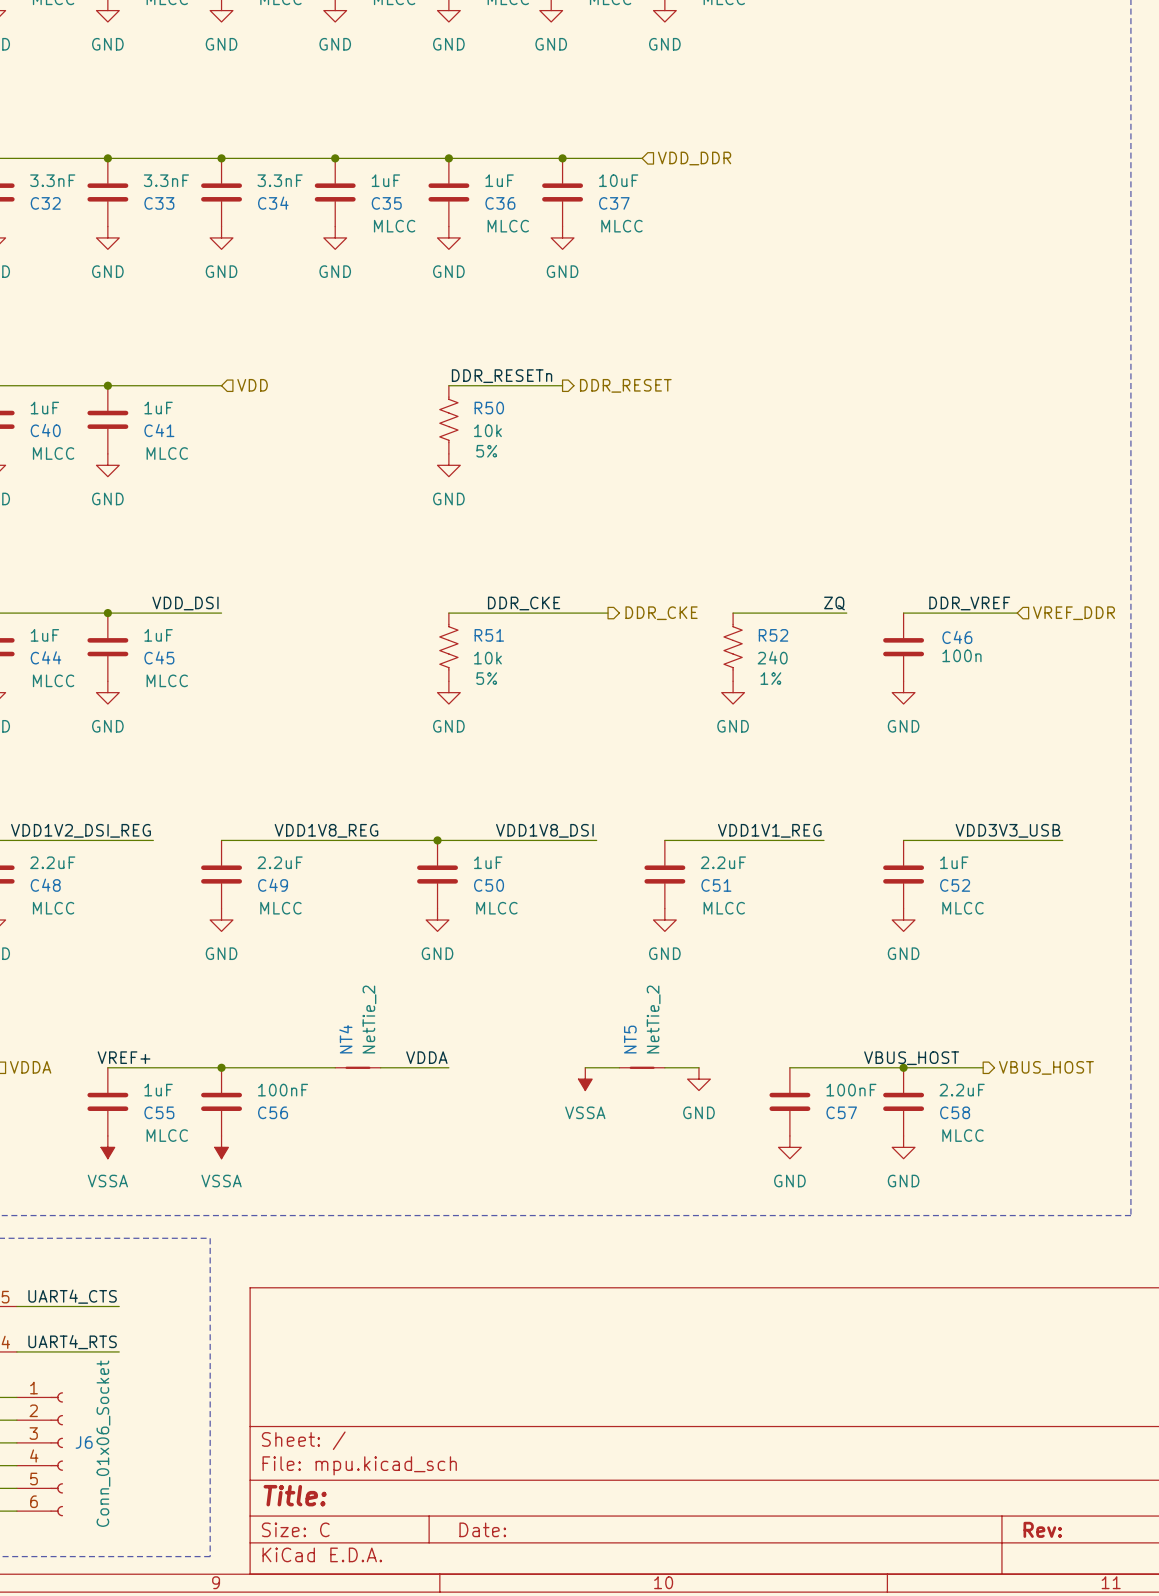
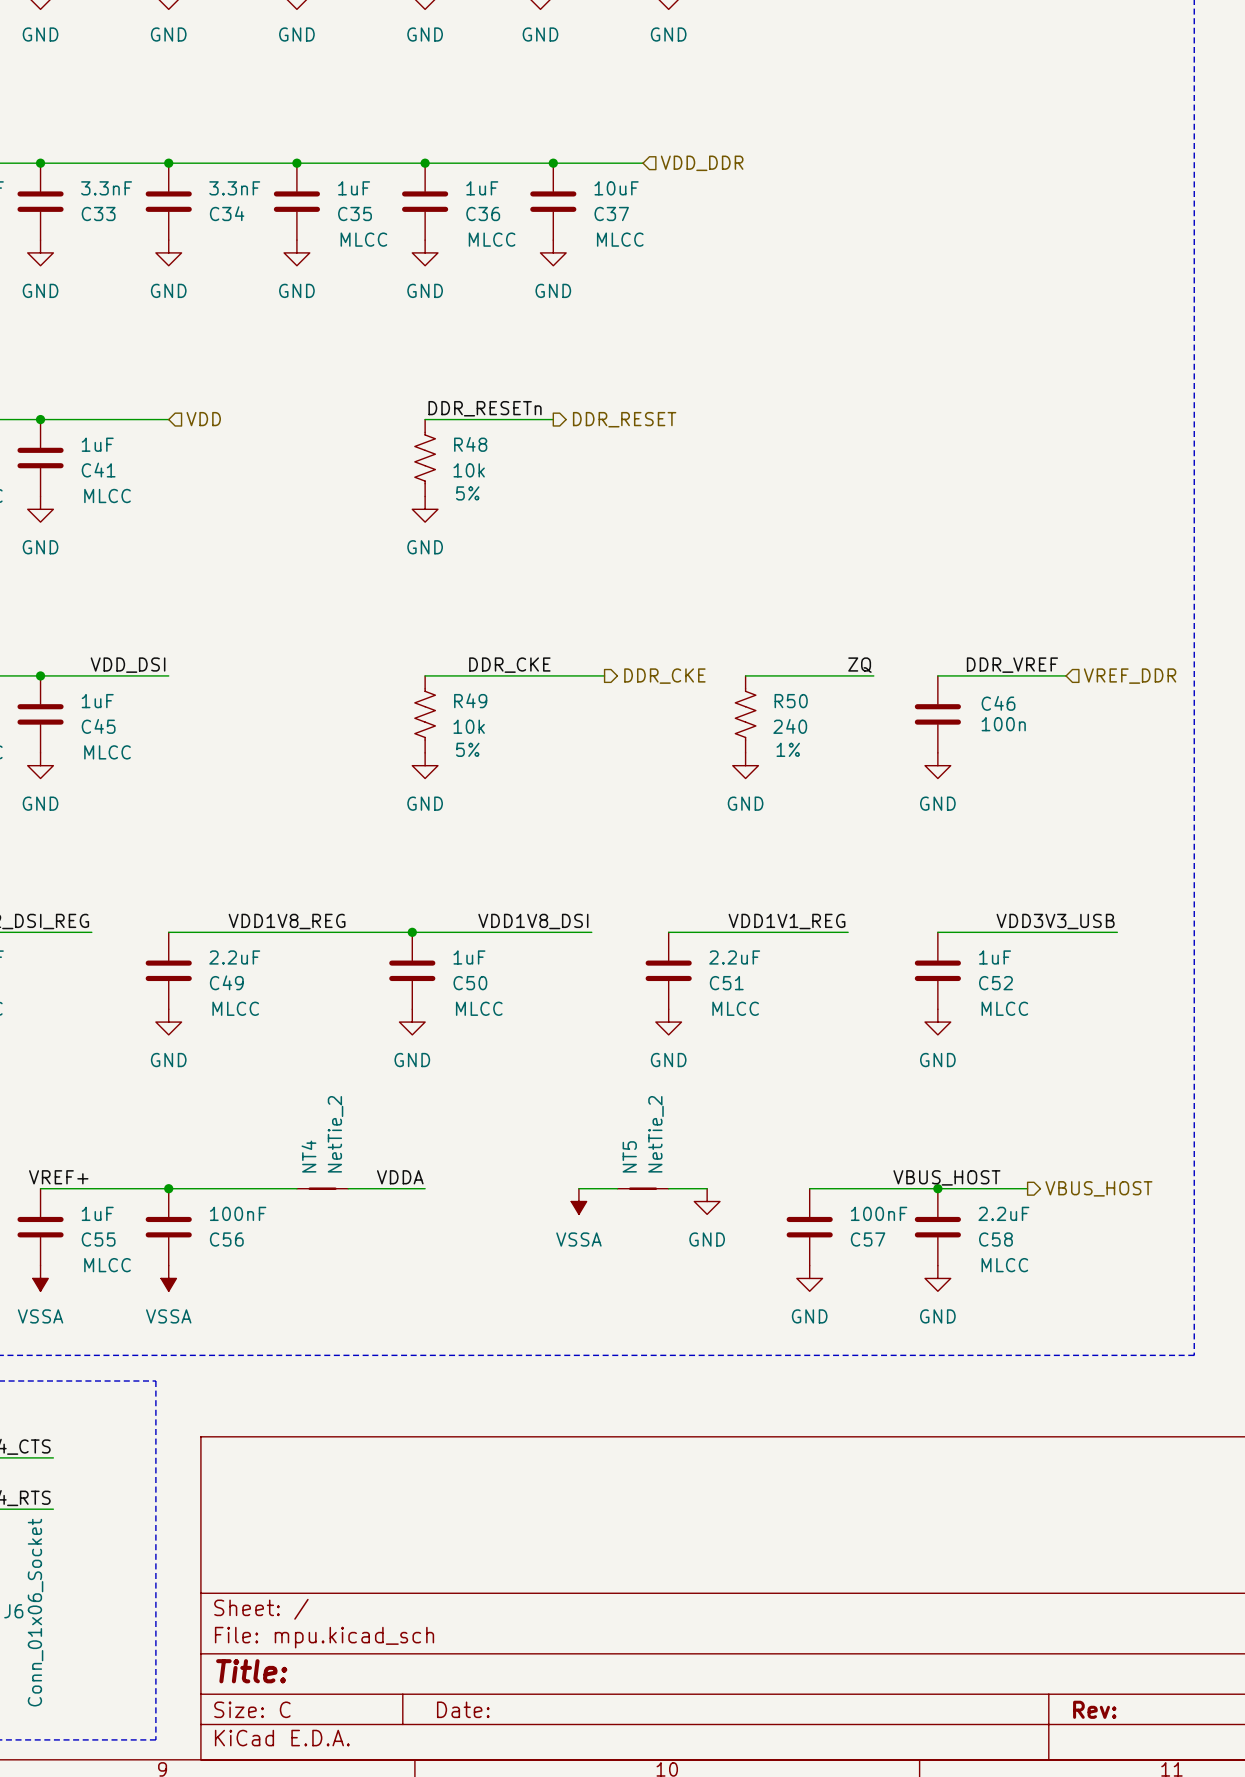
R50 name: R50 (489, 408) -> R48 (470, 444)
R51 name: R51 (489, 635) -> R49 (470, 700)
R52 name: R52 (773, 635) -> R50 (791, 701)

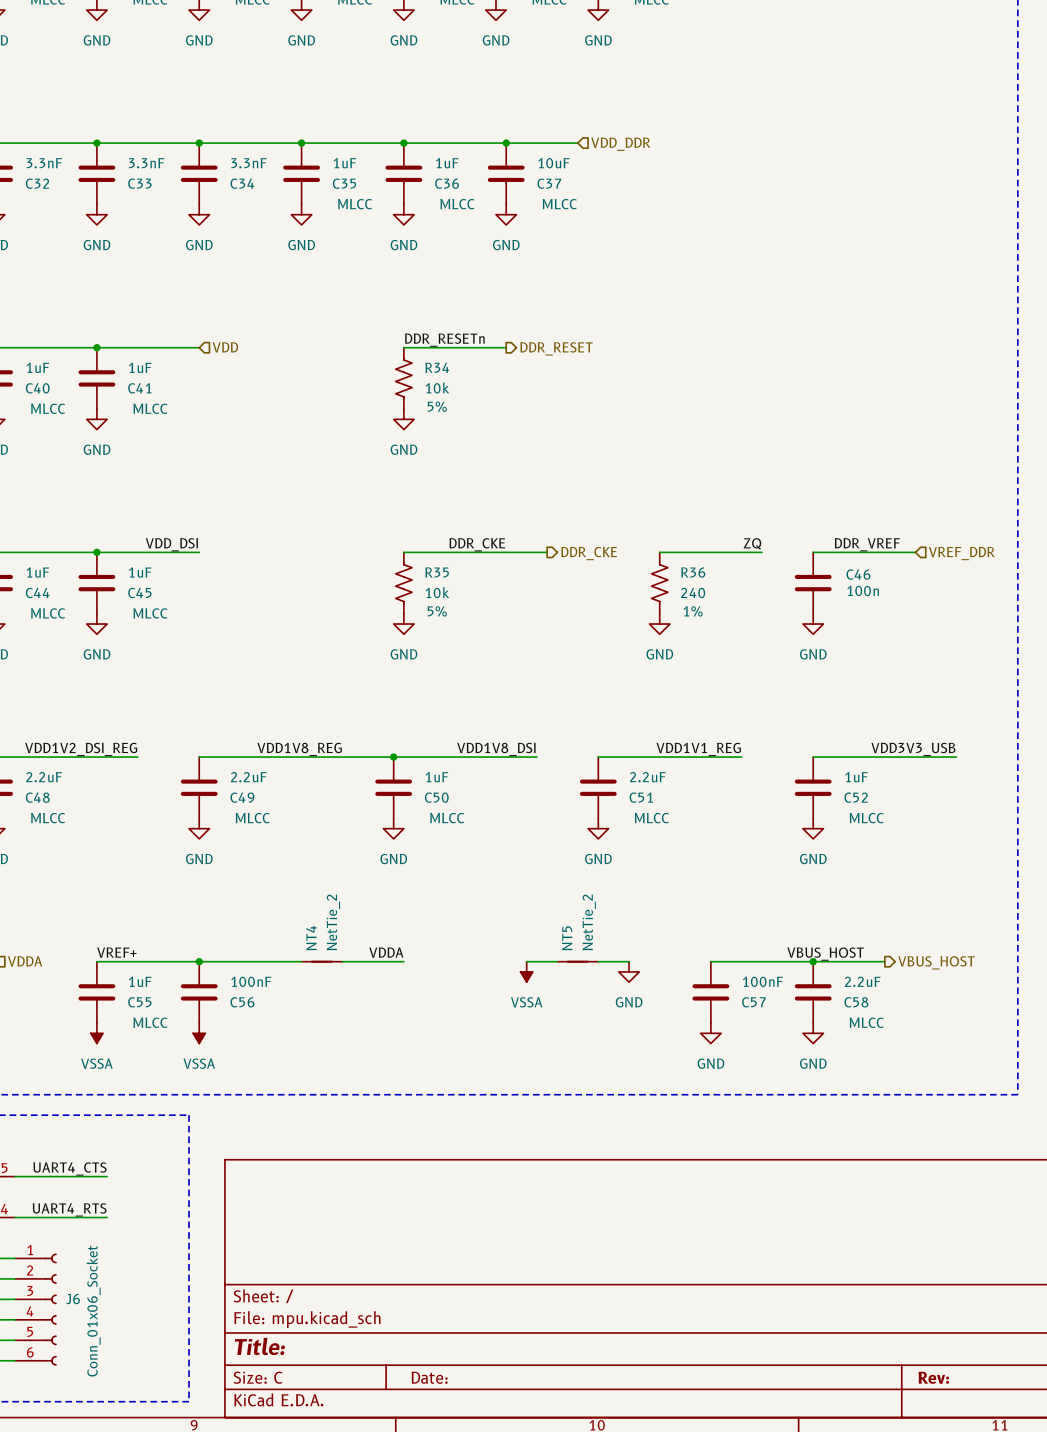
R48 name: R48 (470, 444) -> R34 (437, 367)
R49 name: R49 (470, 700) -> R35 (437, 572)
R50 name: R50 (791, 701) -> R36 (693, 572)

